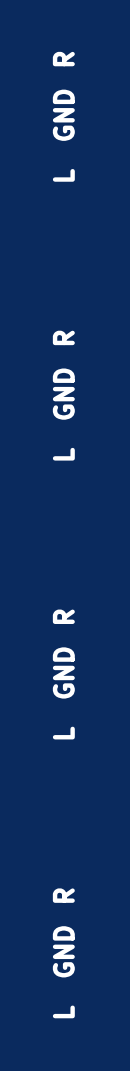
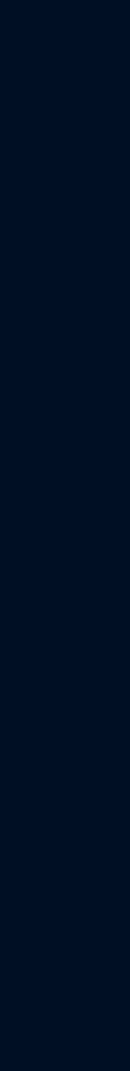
text: R (63, 59) -> none
text: GND (63, 115) -> none
text: L (63, 175) -> none
text: R (63, 337) -> none
text: GND (63, 394) -> none
text: L (63, 454) -> none
text: R (63, 616) -> none
text: GND (63, 672) -> none
text: L (63, 733) -> none
text: R (63, 895) -> none
text: GND (63, 951) -> none
text: L (63, 1011) -> none

